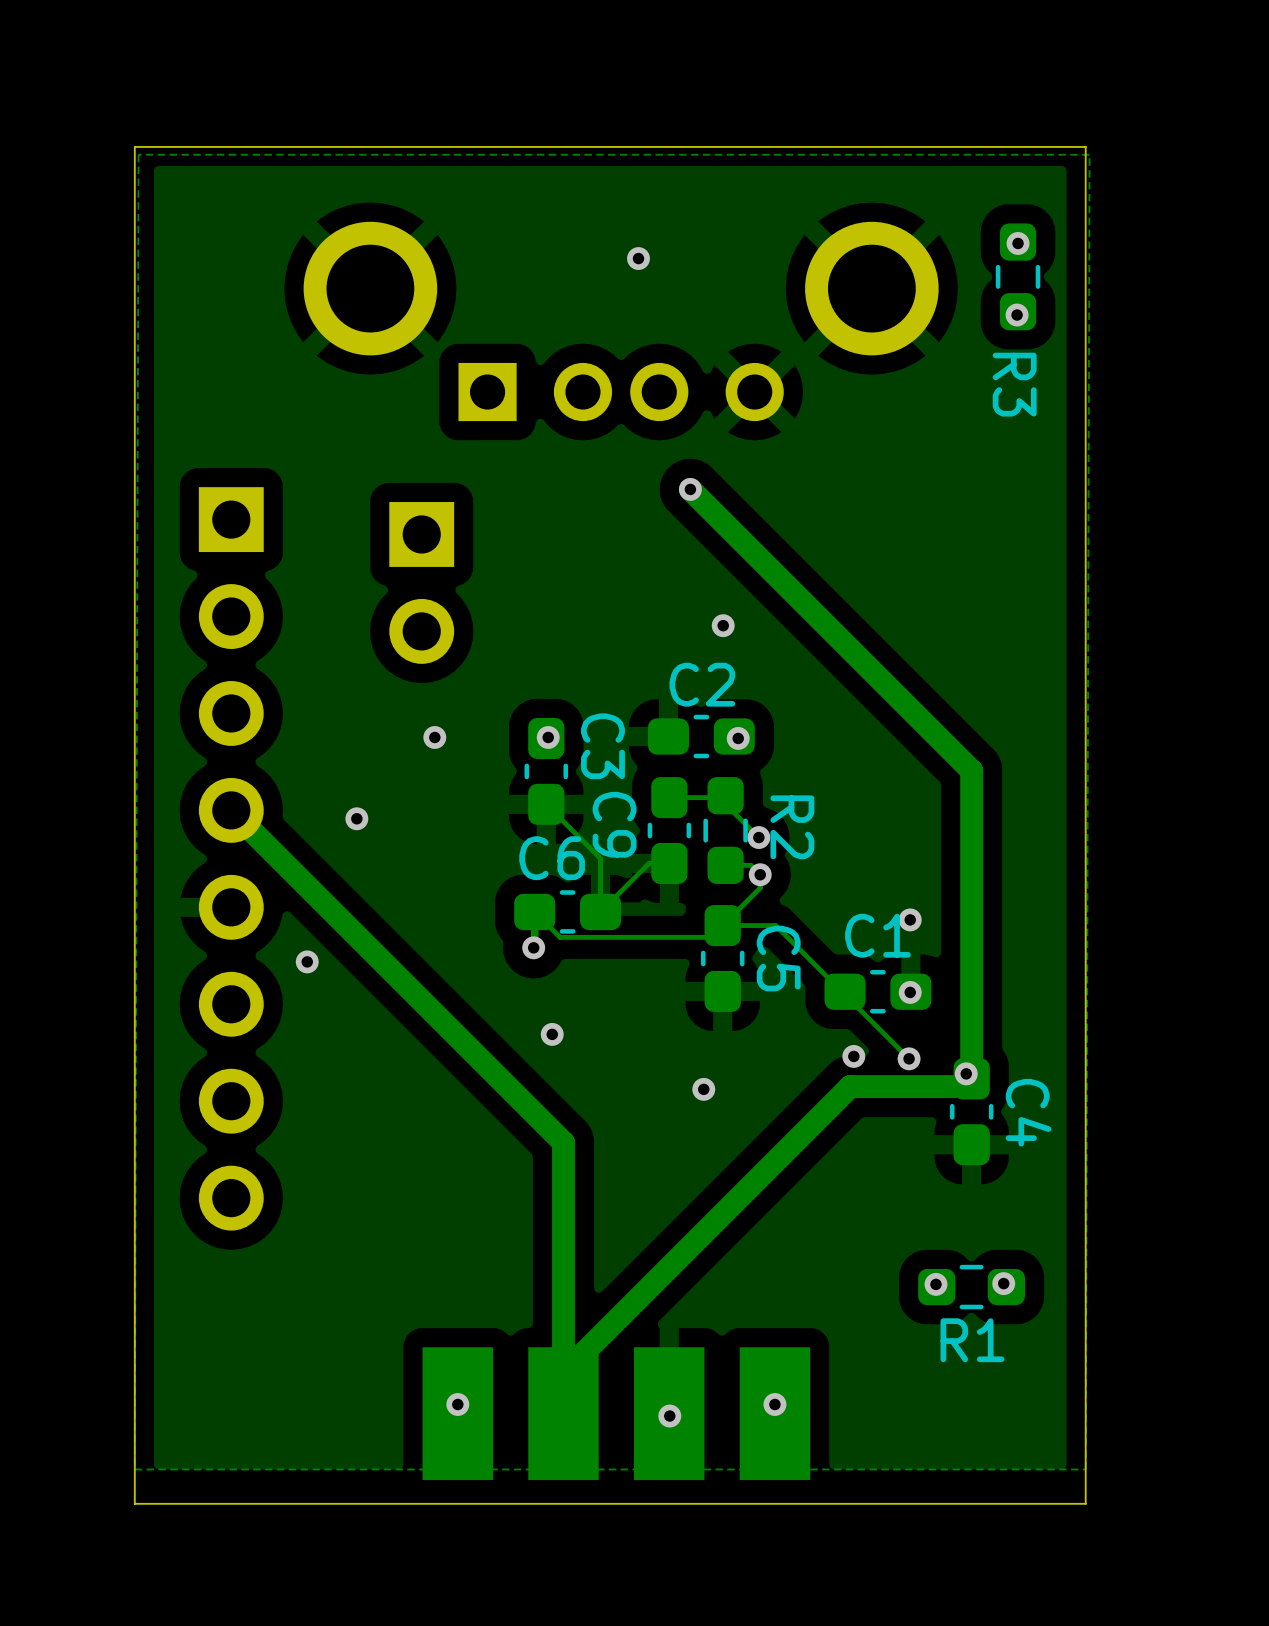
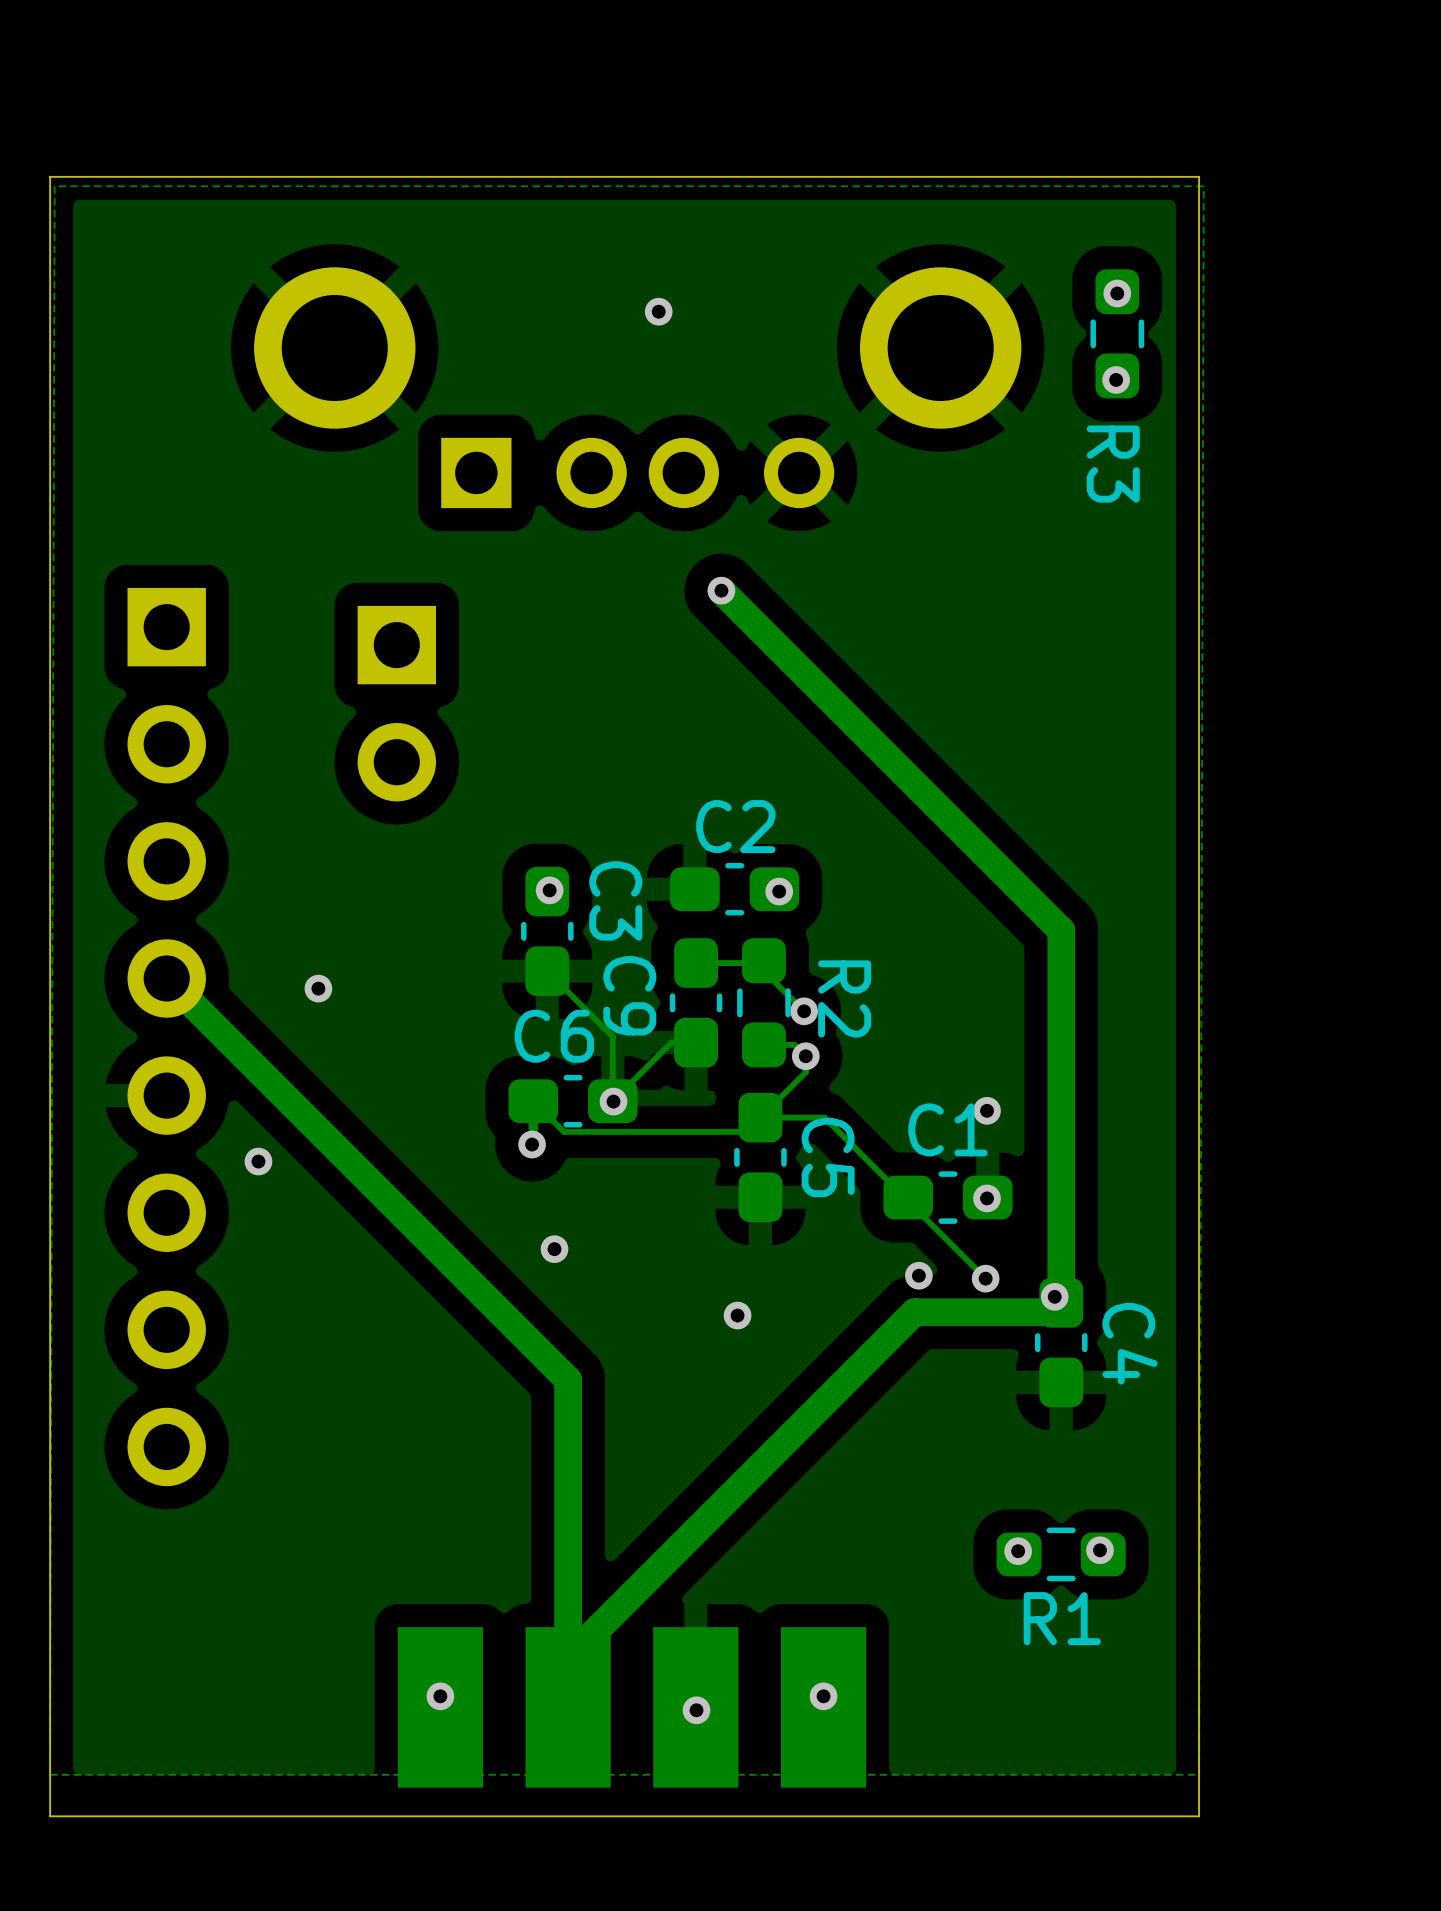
via: (723, 625) -> none
via: (434, 737) -> none
via: none -> (613, 1101)

